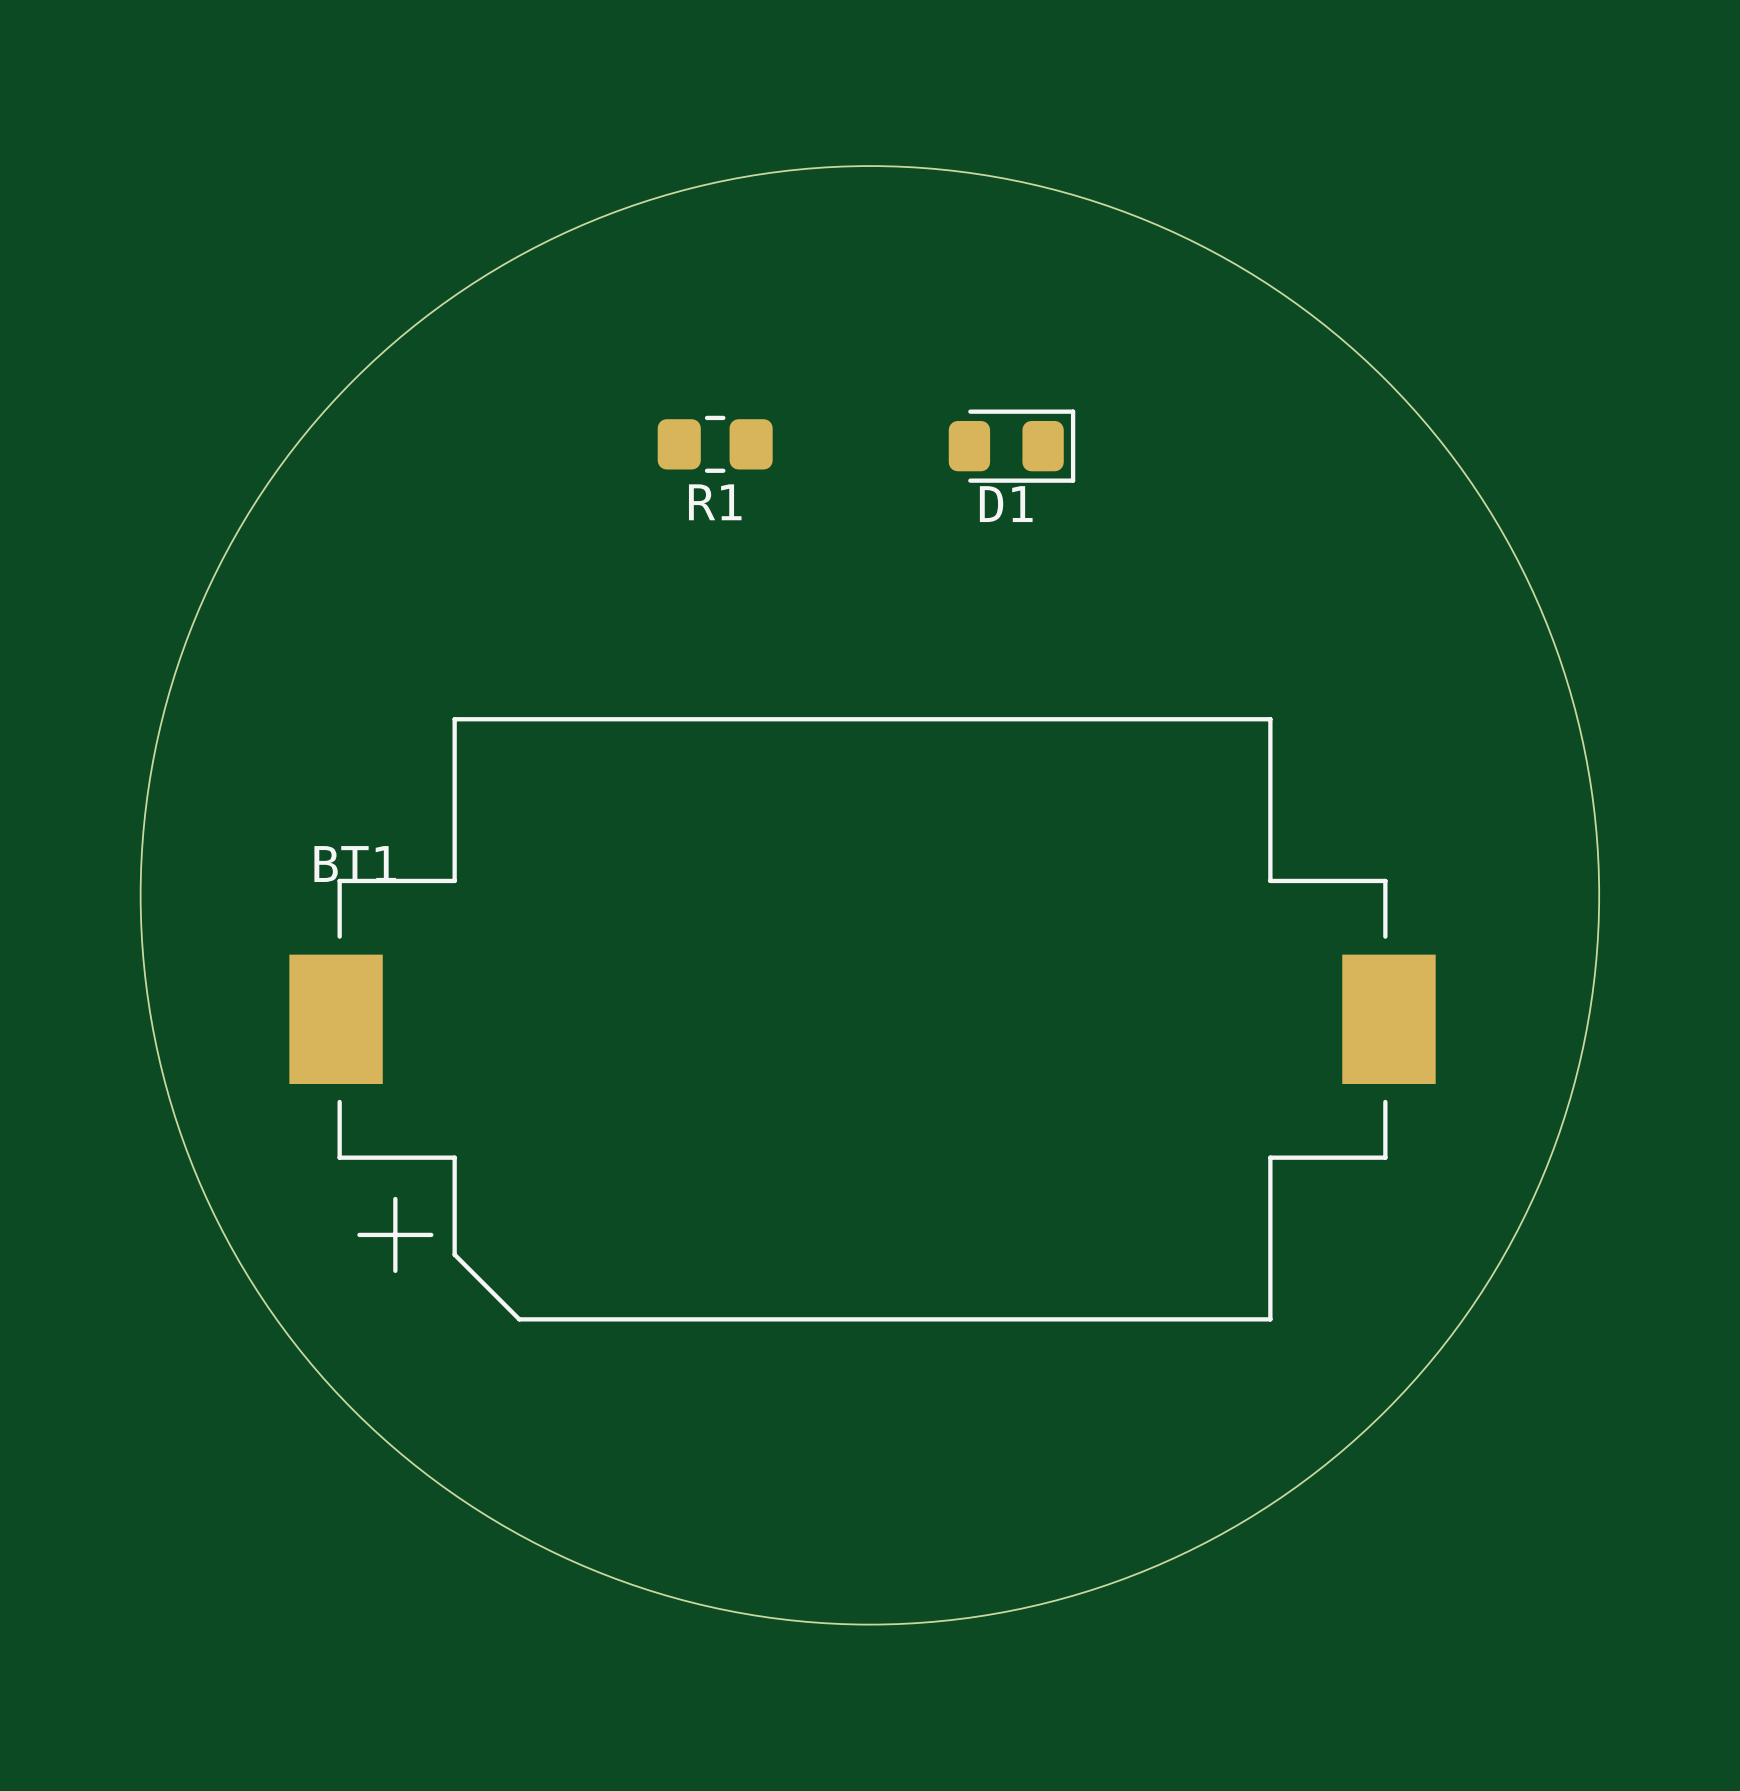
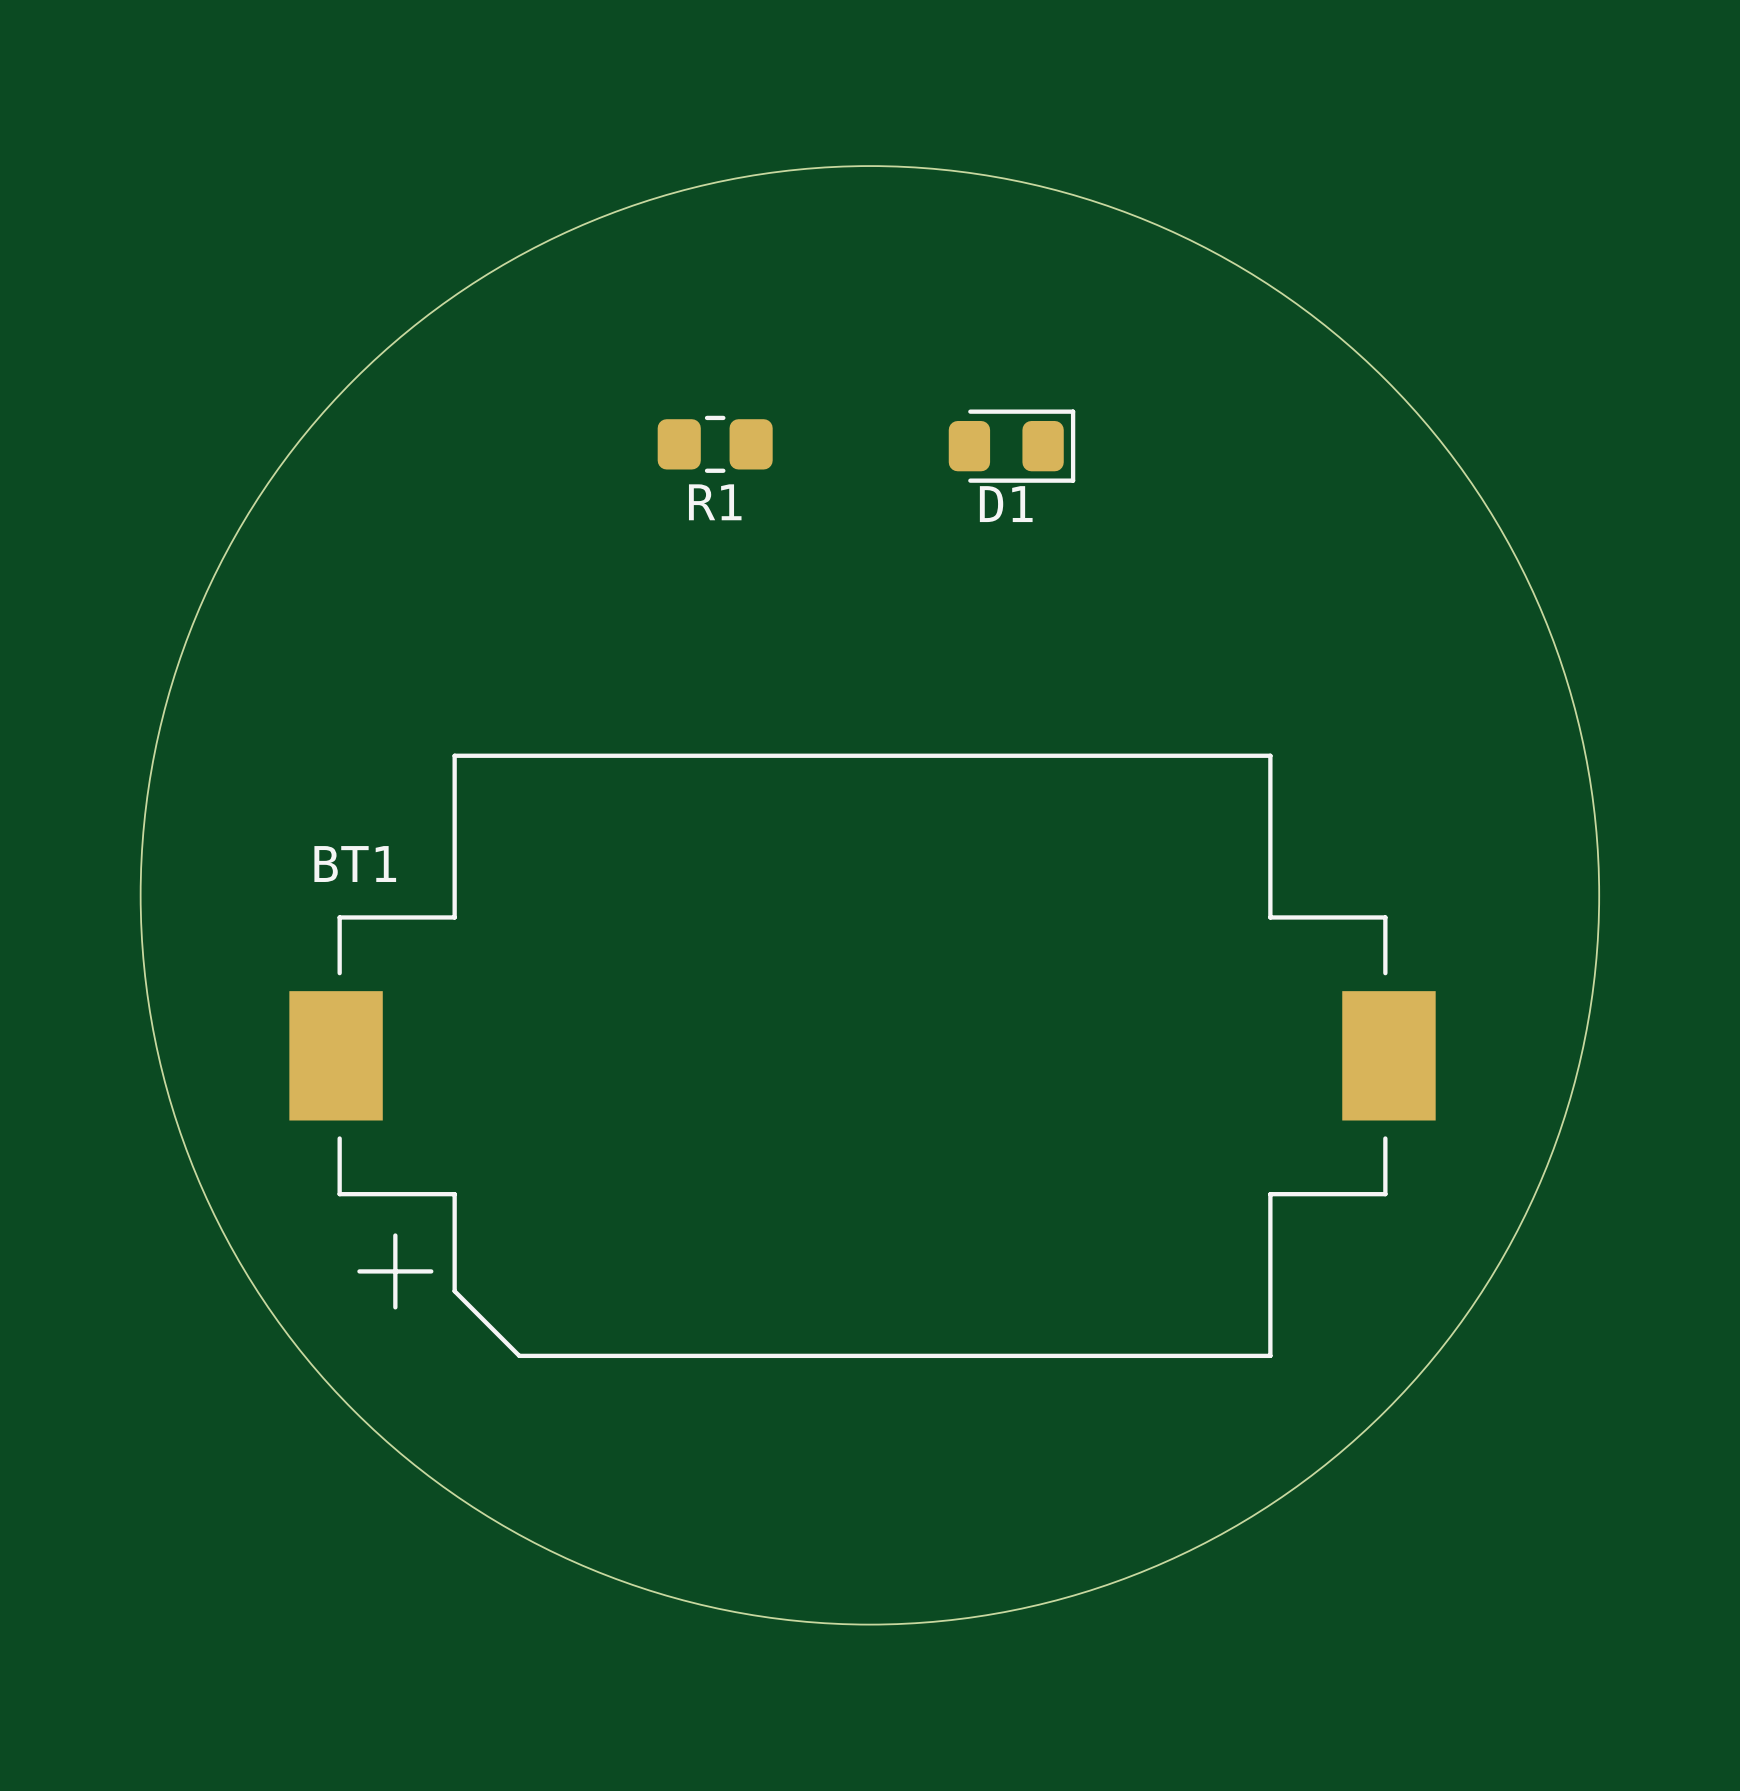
BT1 position: (862, 1019) -> (862, 1055)

